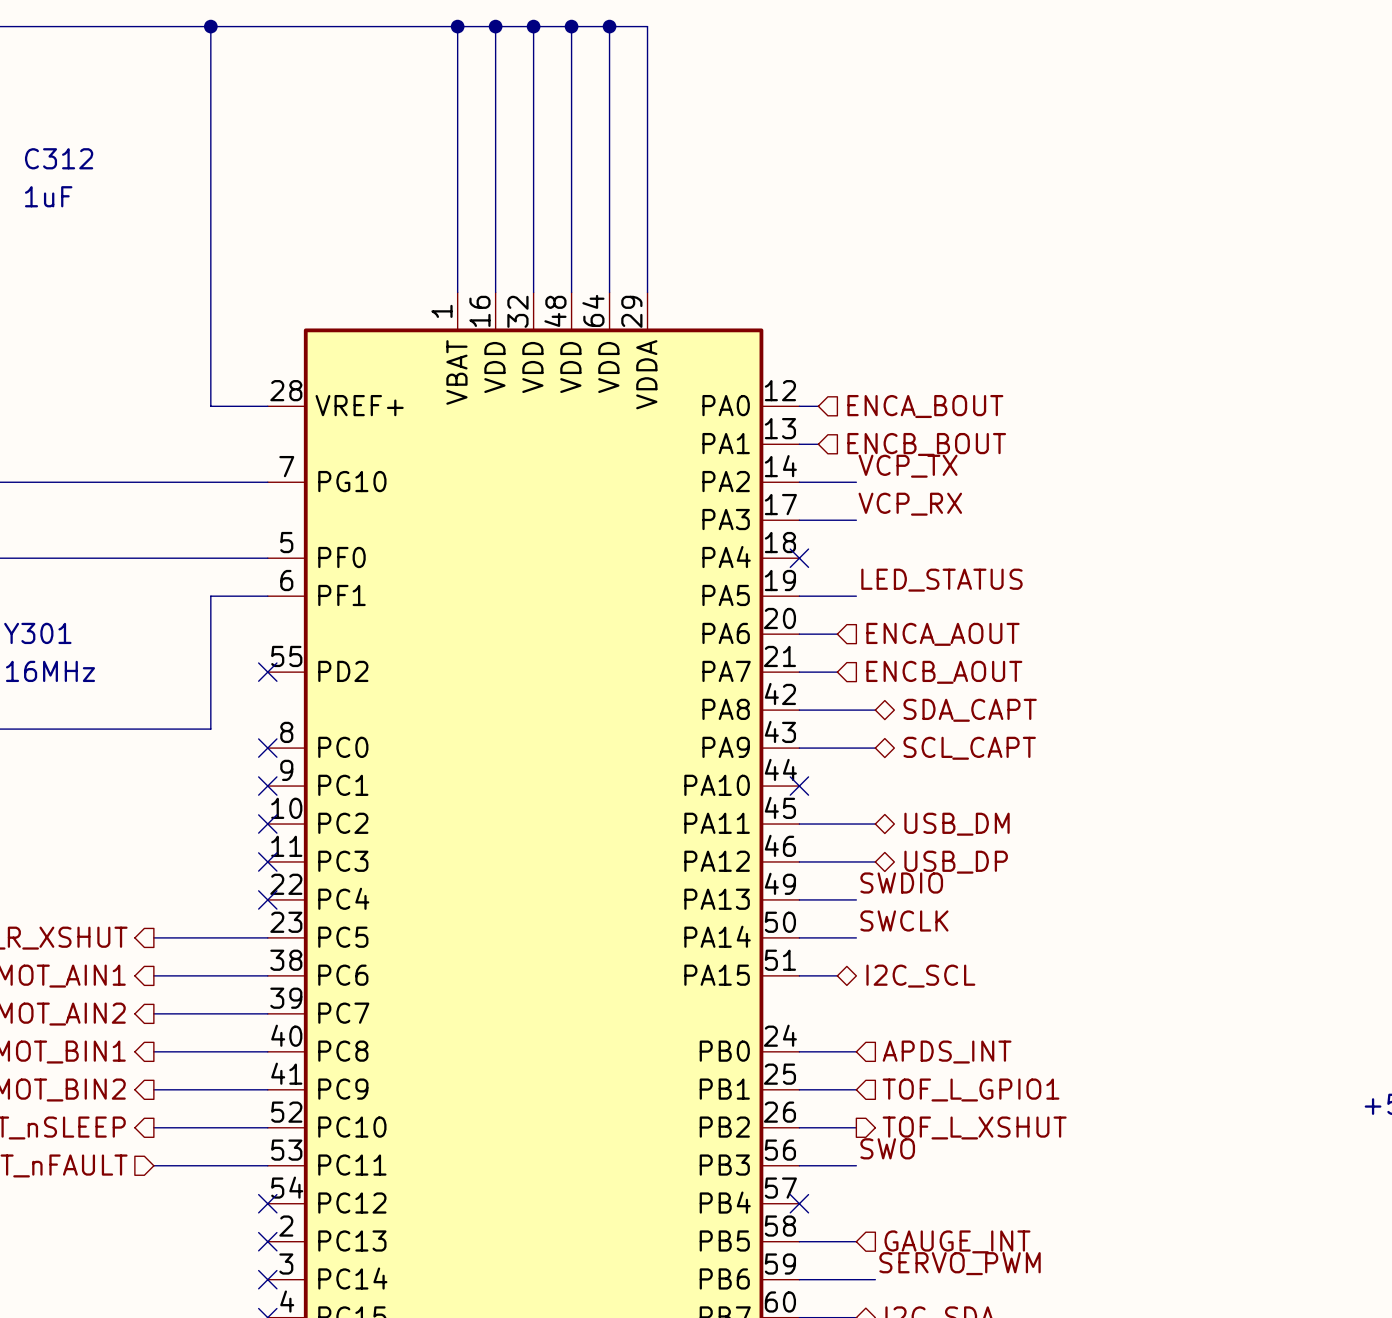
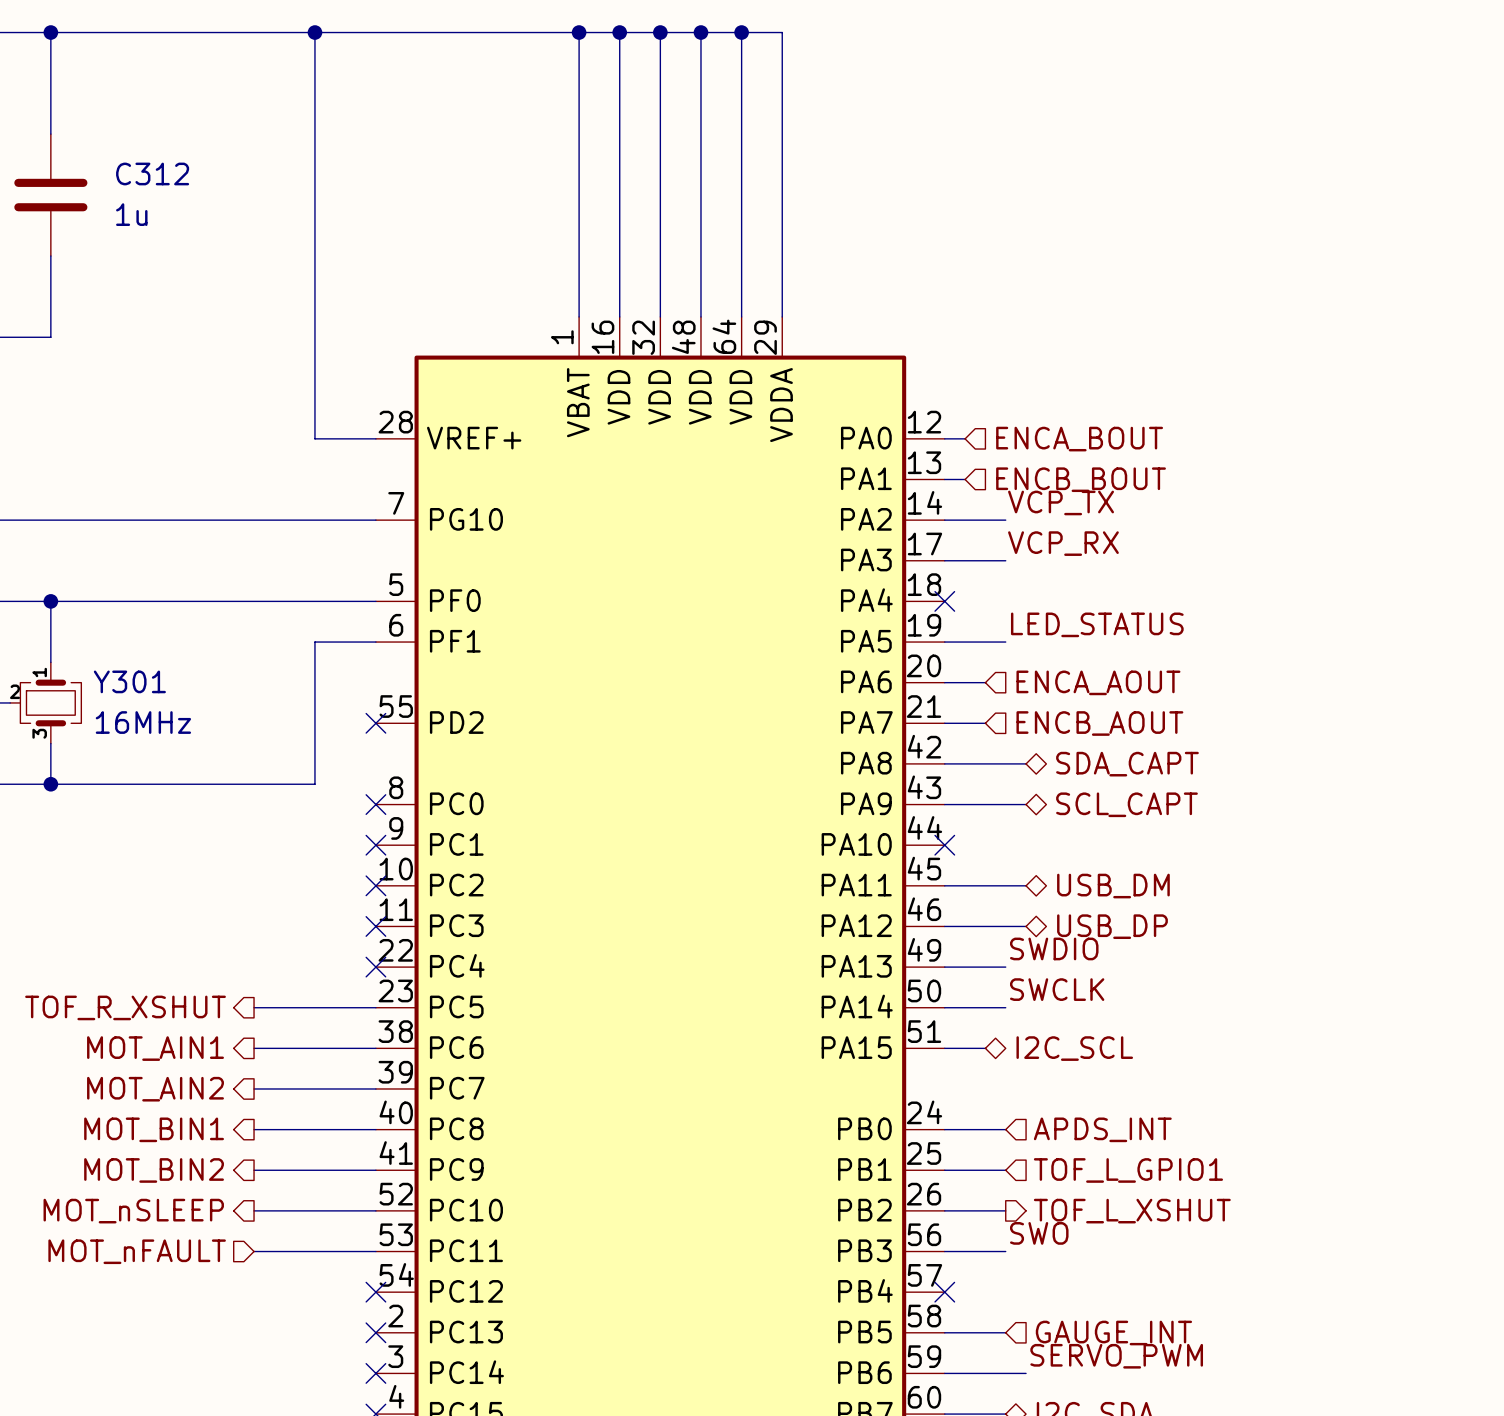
C312 value: 1uF (48, 196) -> 1u (131, 214)

